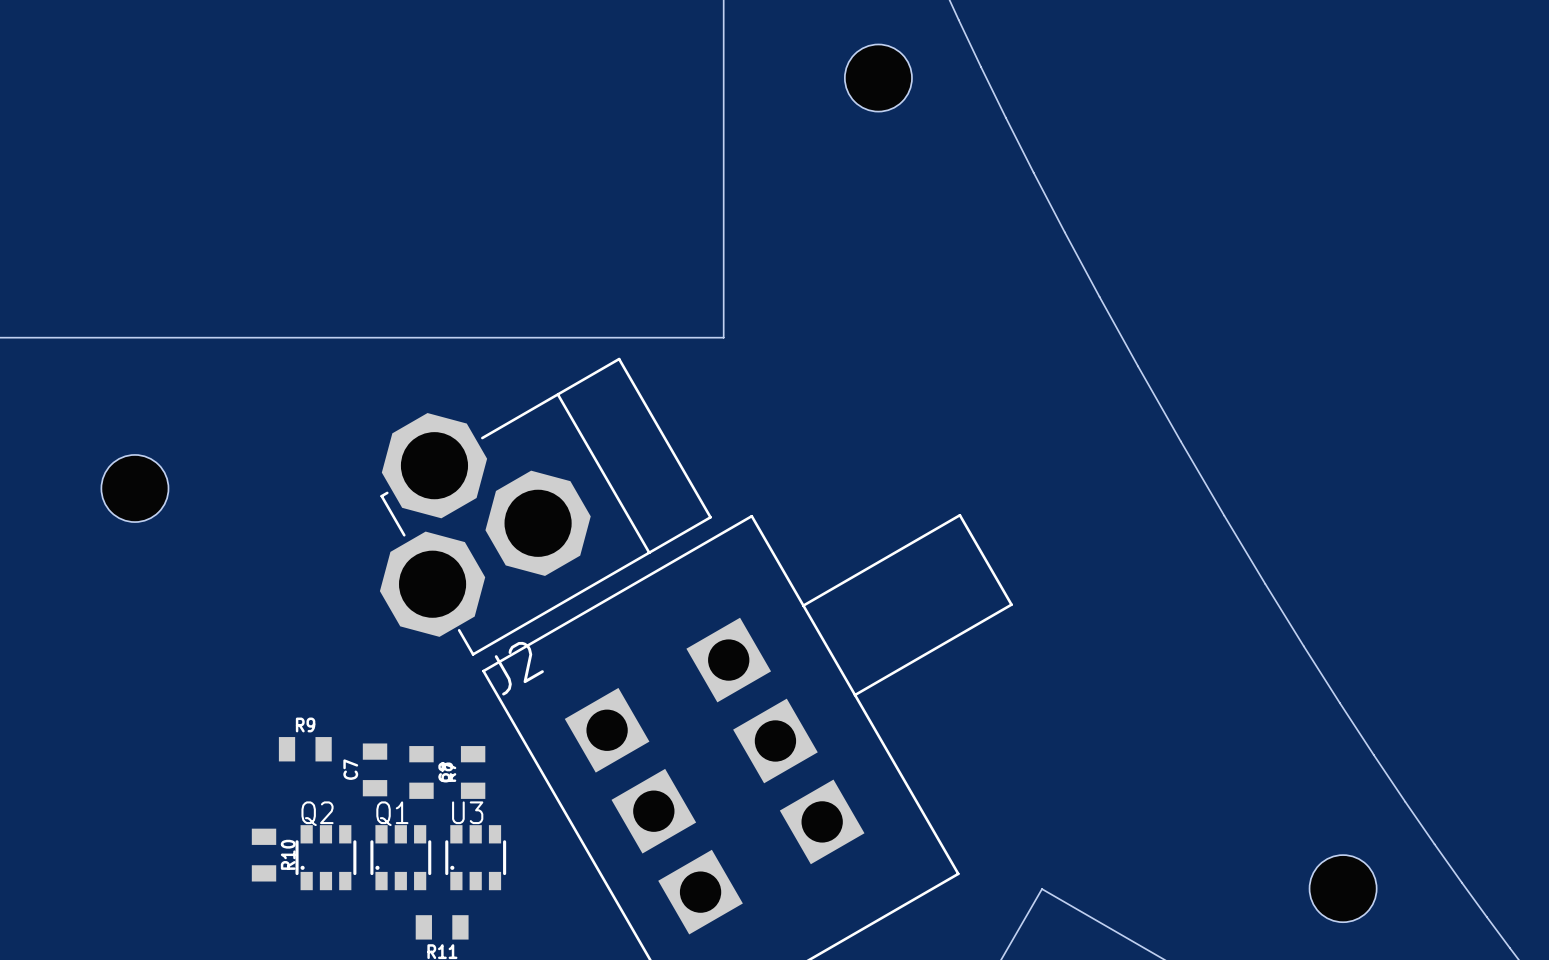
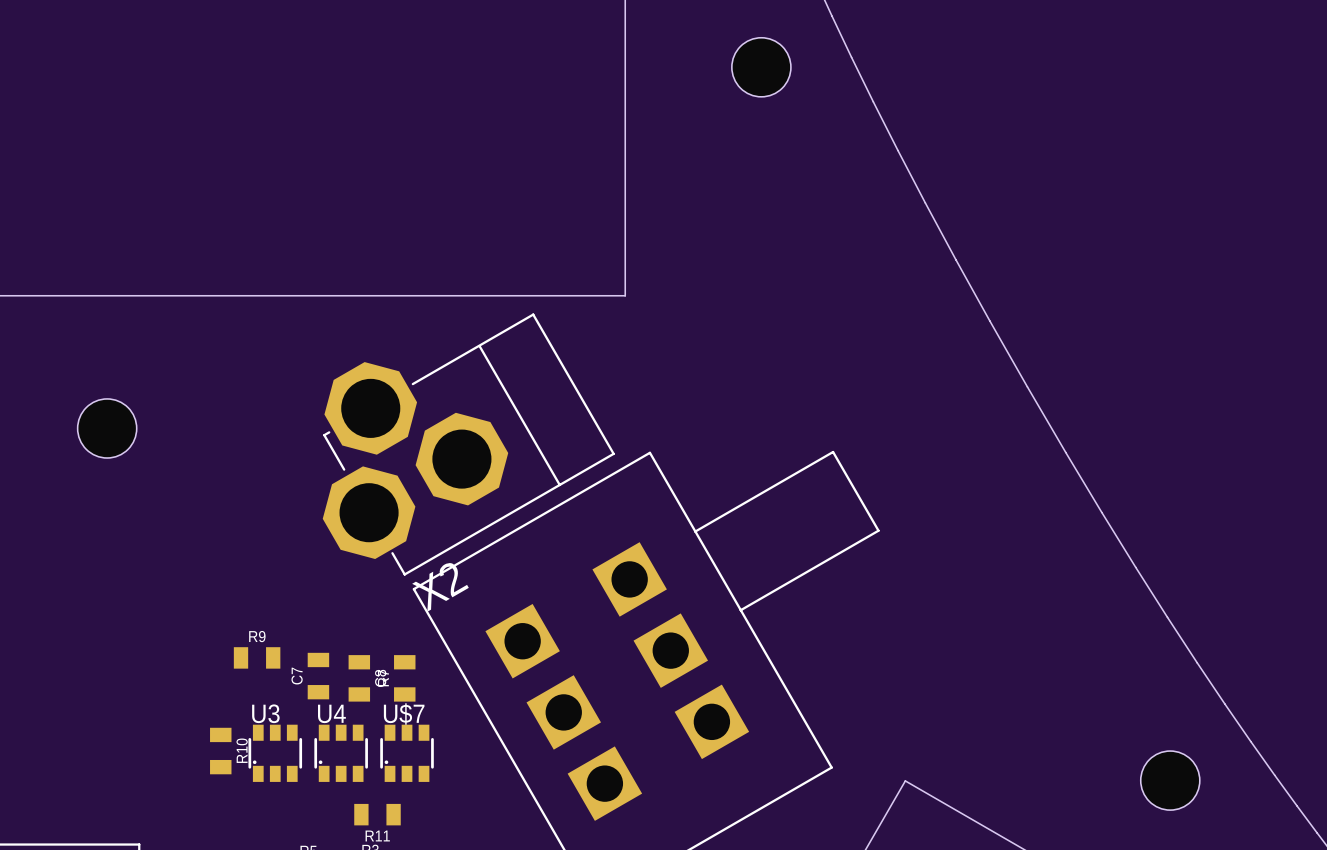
J2 name: J2 (519, 668) -> X2 (440, 587)
U3 name: U3 (467, 812) -> U$7 (404, 714)
Q2 name: Q2 (317, 813) -> U3 (265, 713)
Q1 name: Q1 (392, 813) -> U4 (331, 713)

